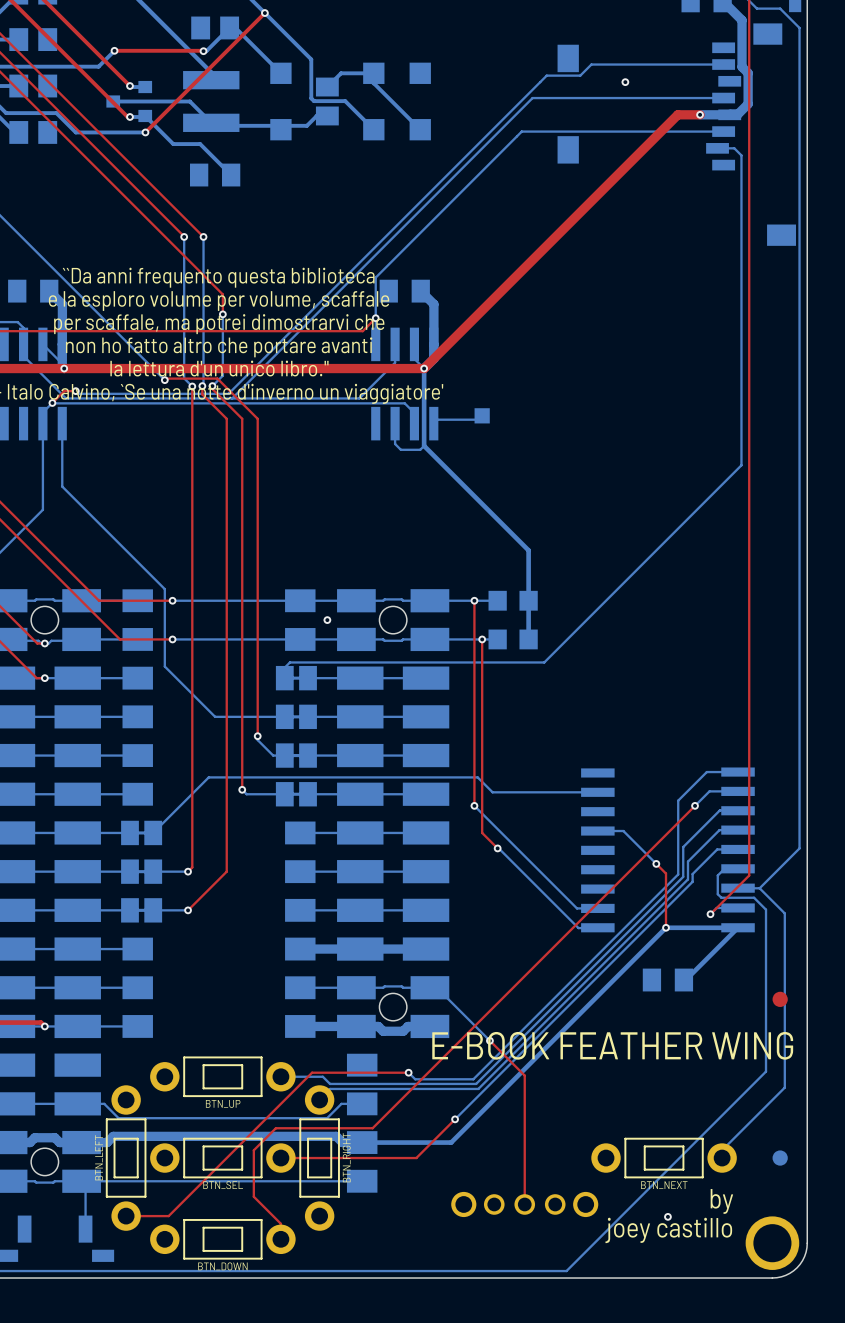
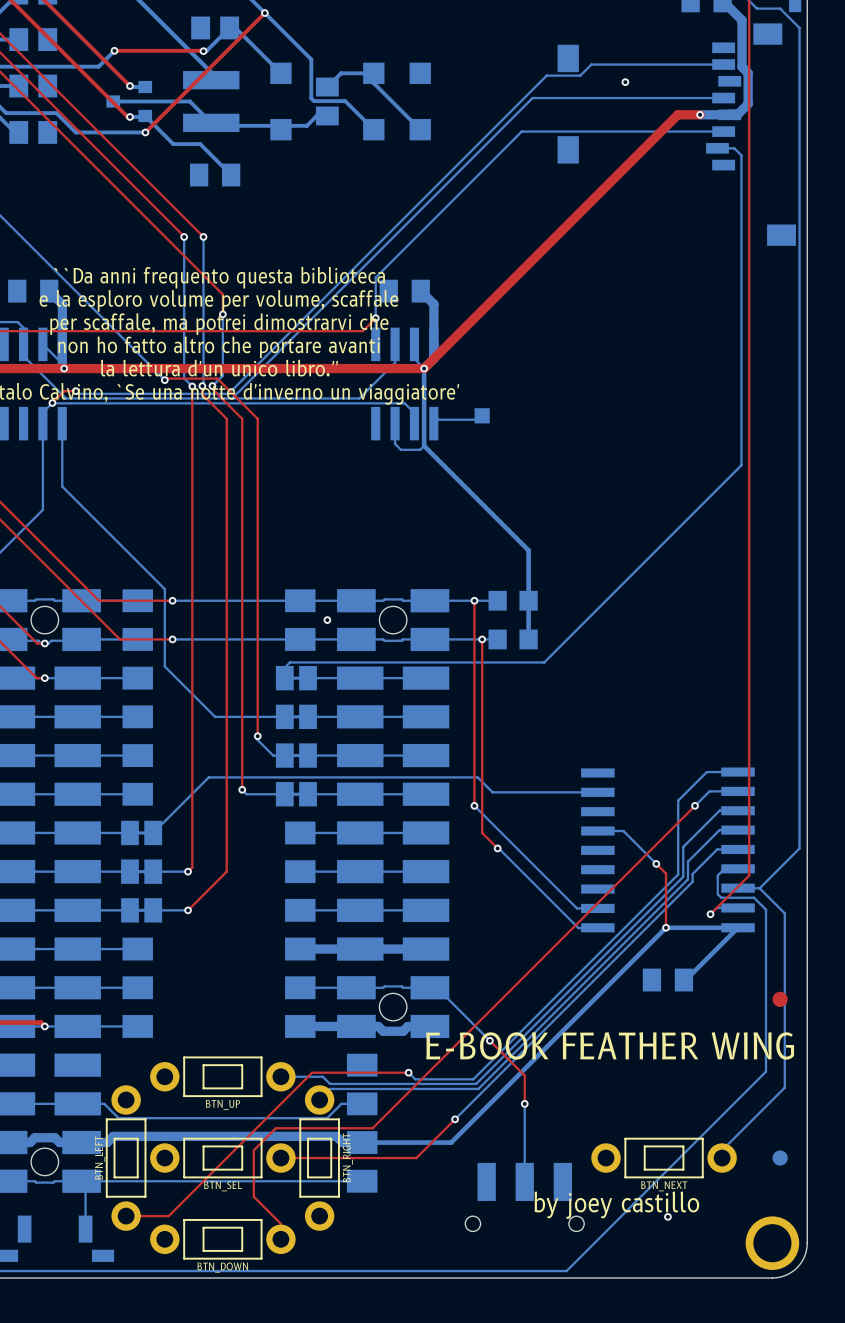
bottom track: none -> (524, 1103) (524, 1181)
top track: (524, 1103) (524, 1204) -> none
via: none -> (524, 1103)
part footprint: [451, 1191, 599, 1218] -> [465, 1162, 585, 1232]
text: by (721, 1201) -> none
text: joey castillo (668, 1230) -> by joey castillo (616, 1205)

